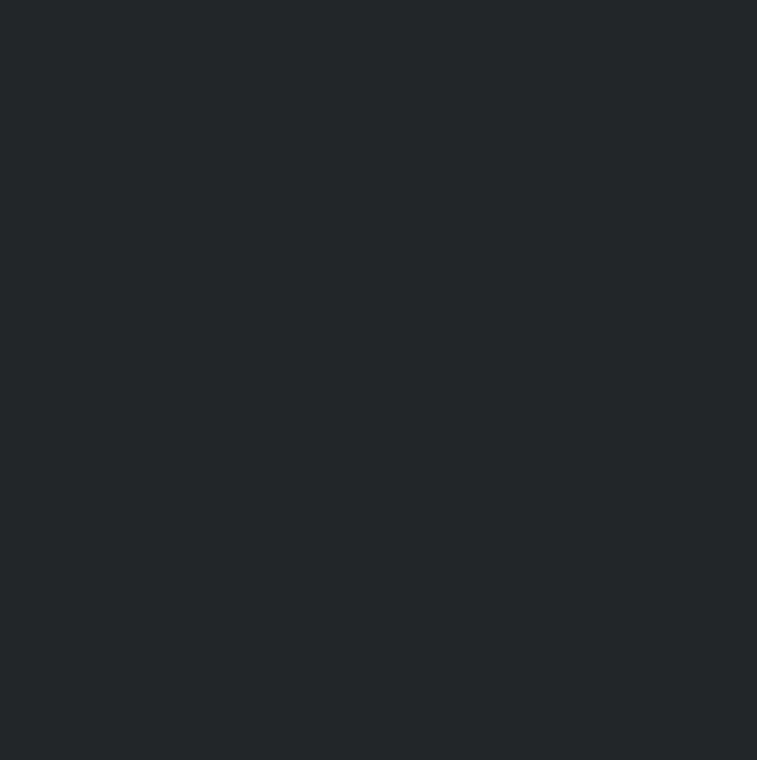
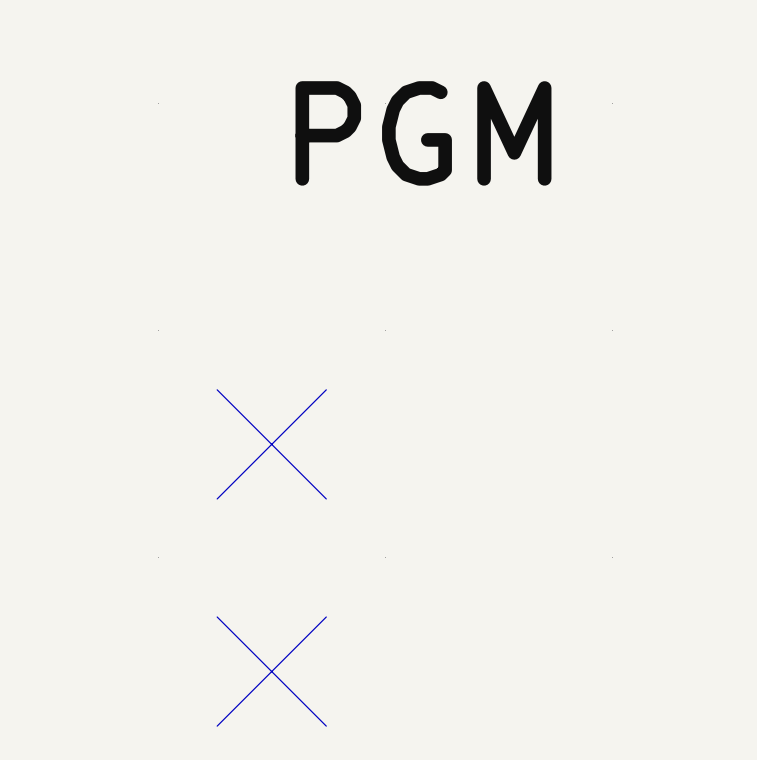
label: none -> PGM (423, 133)
no-connect mark: none -> (271, 444)
no-connect mark: none -> (271, 671)

